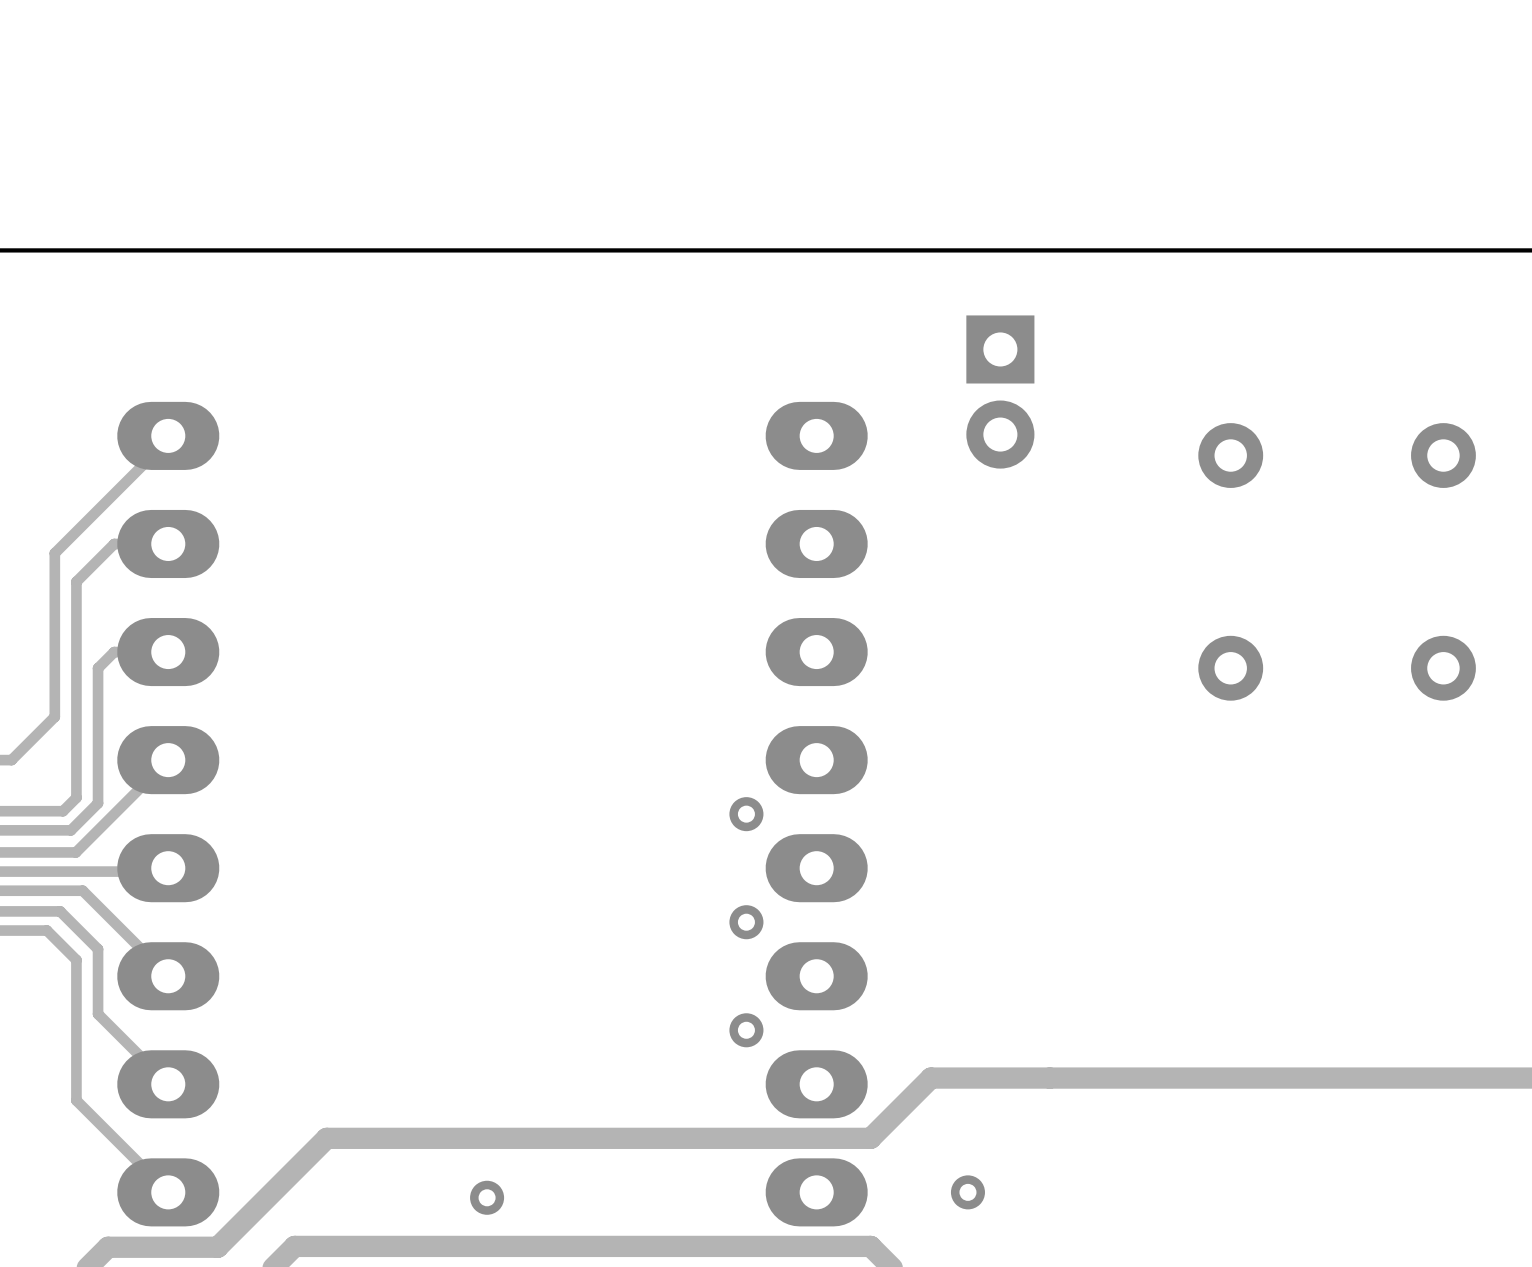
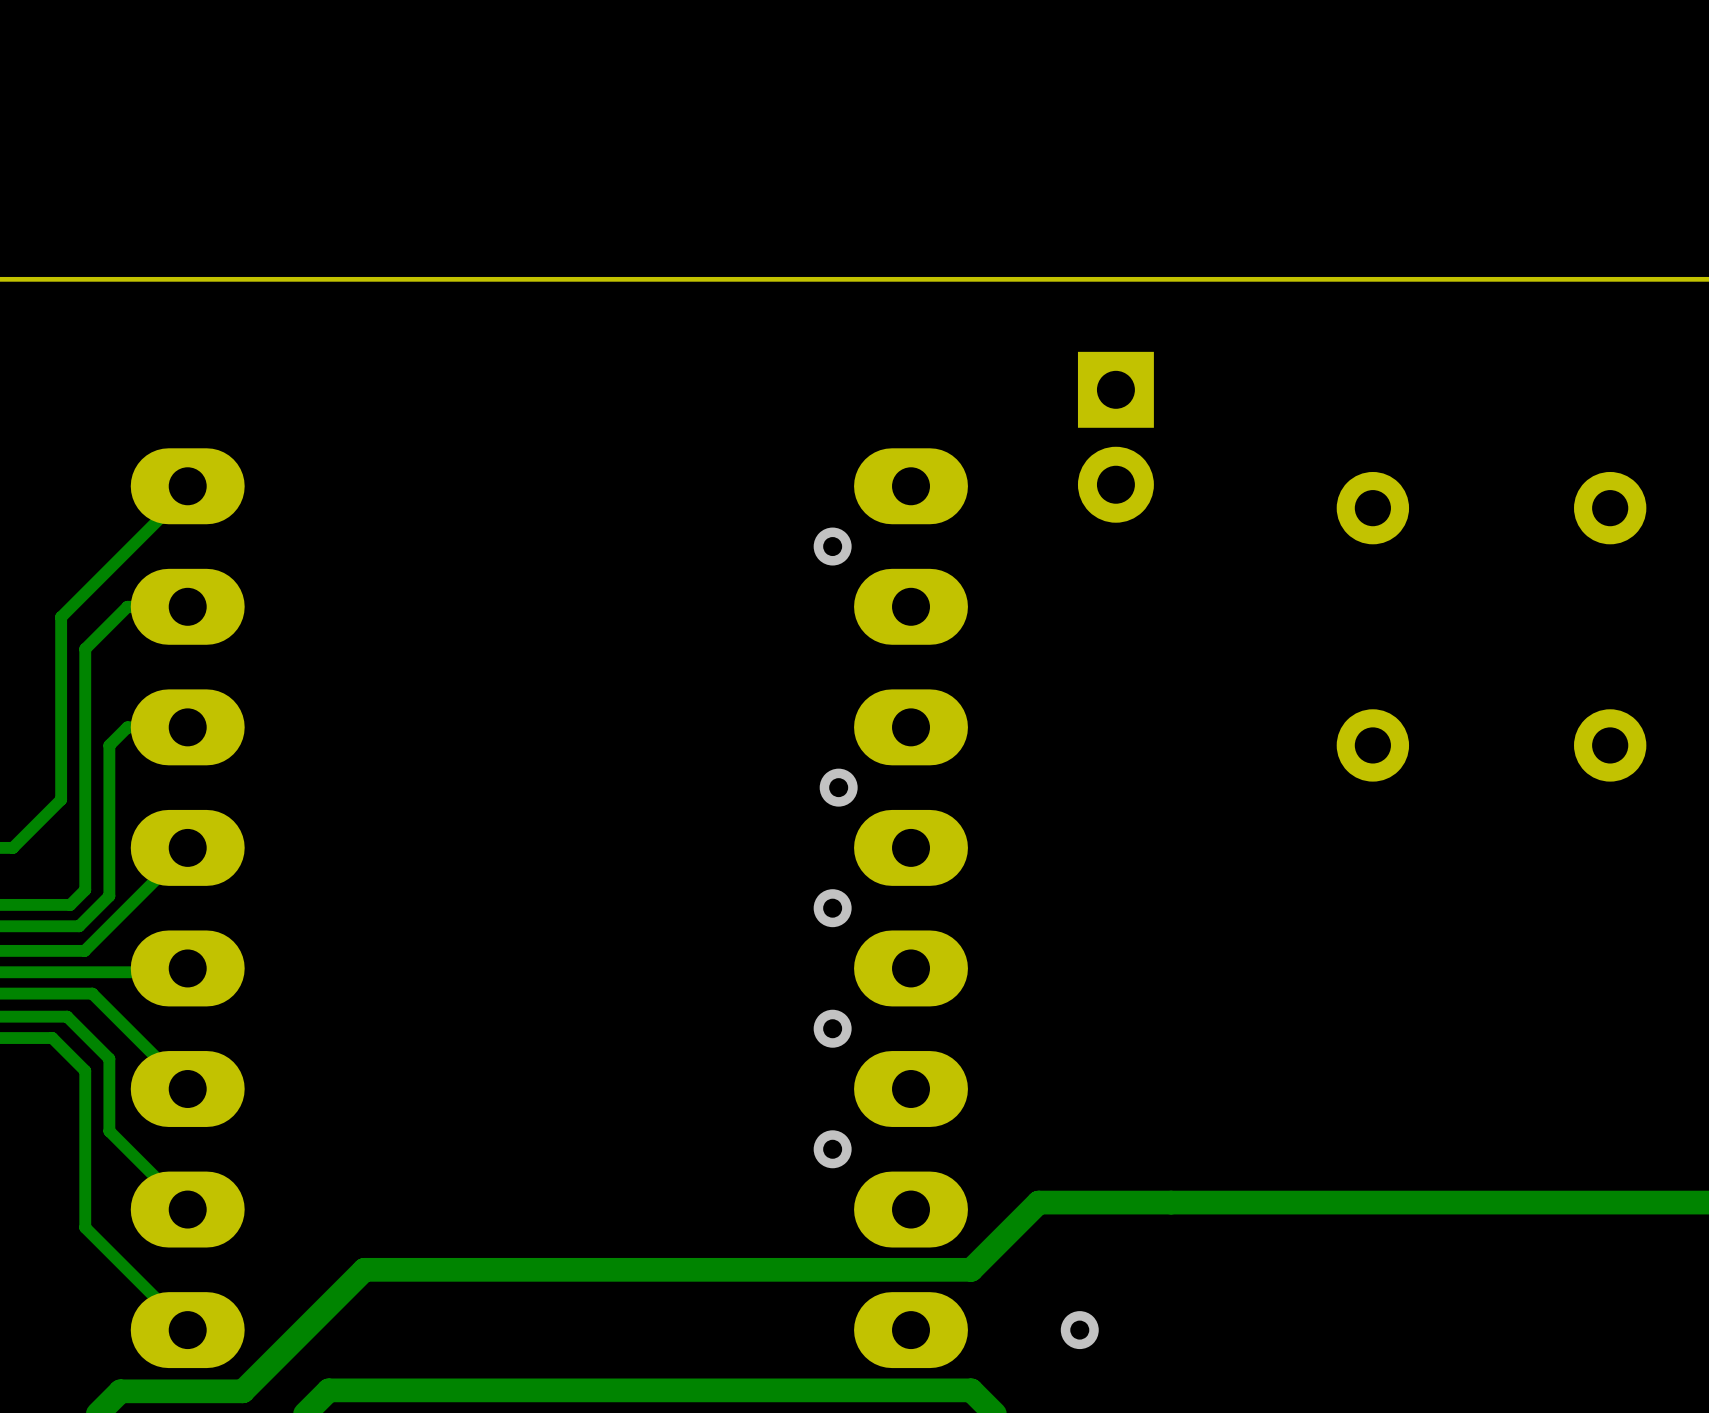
via: none -> (832, 546)
via: none -> (838, 787)
via: (487, 1197) -> none

